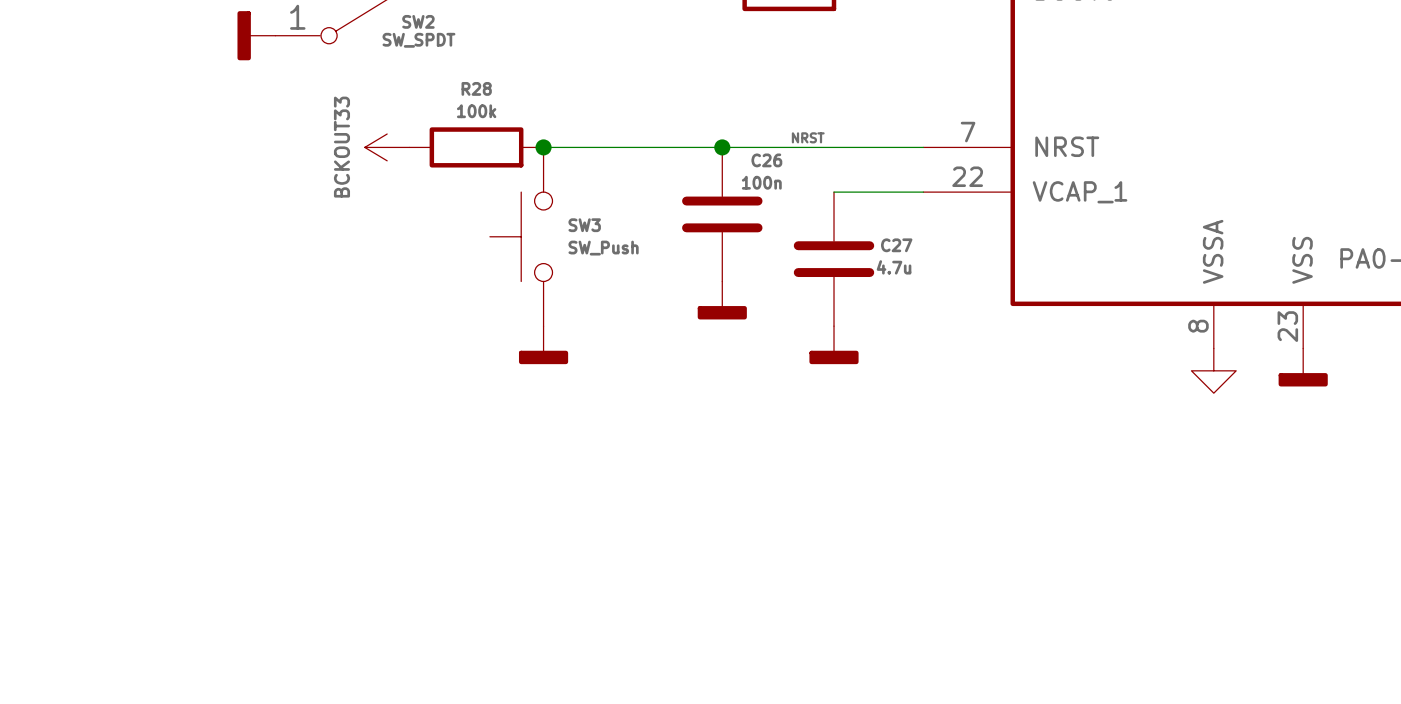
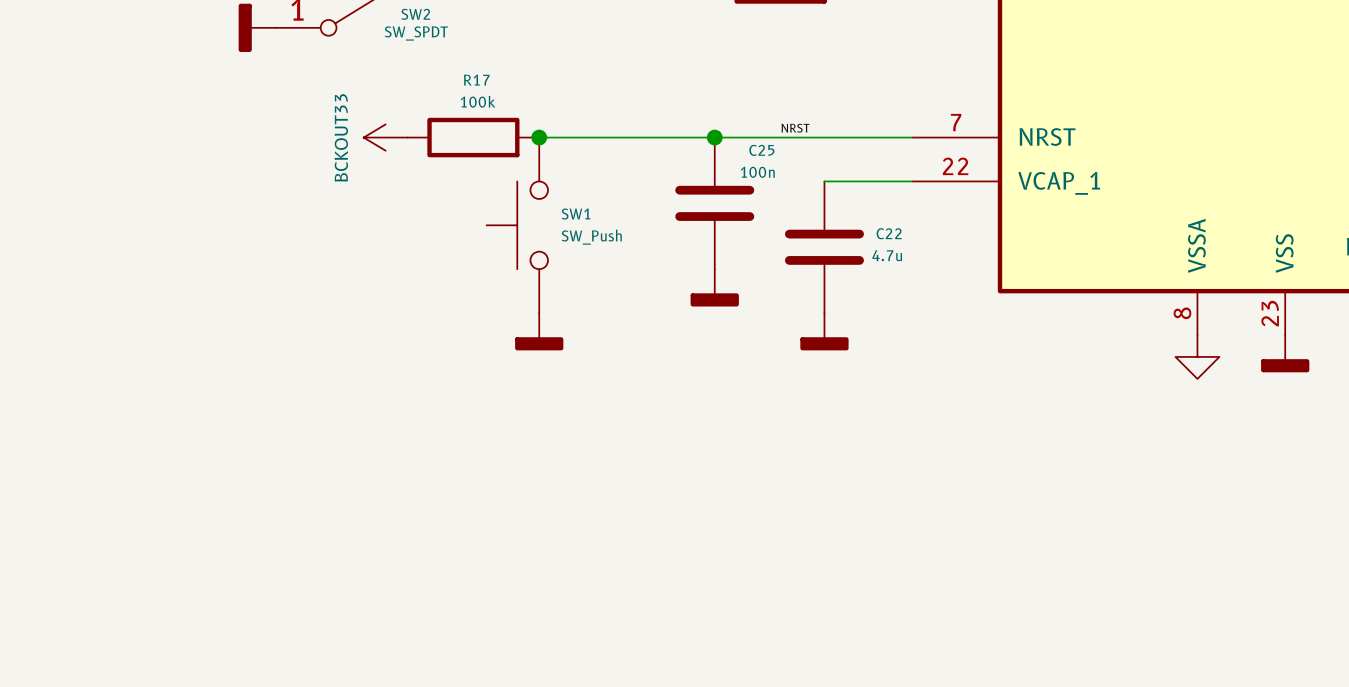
R28 name: R28 (476, 88) -> R17 (476, 80)
C26 name: C26 (766, 160) -> C25 (761, 150)
SW3 name: SW3 (584, 225) -> SW1 (576, 214)
C27 name: C27 (896, 245) -> C22 (889, 233)

